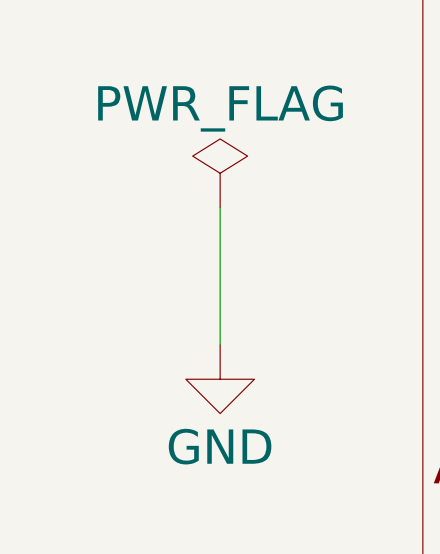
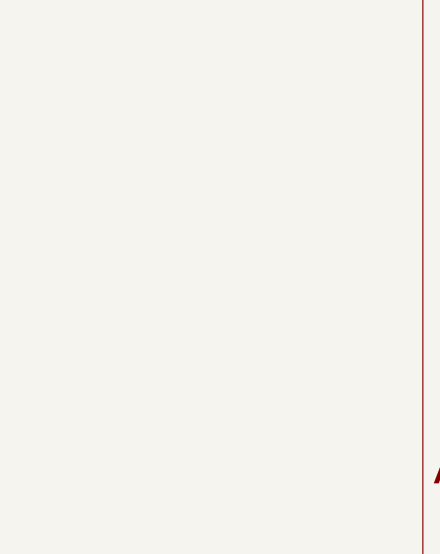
power symbol: PWR_FLAG (220, 173) -> none
wire: (220, 207) (220, 344) -> none
power symbol: GND (220, 379) -> none

